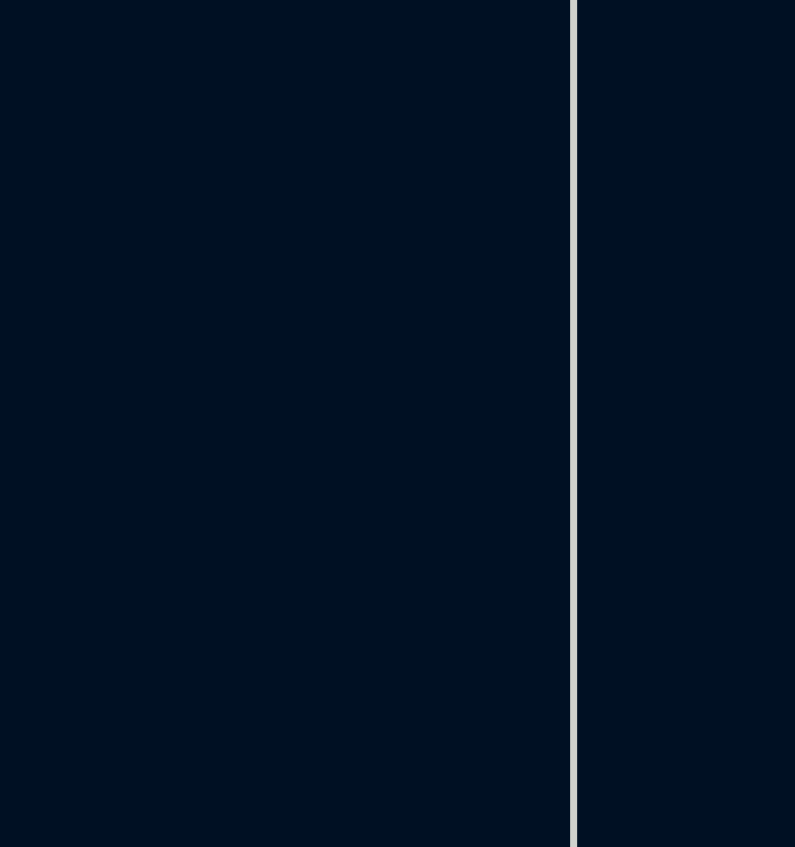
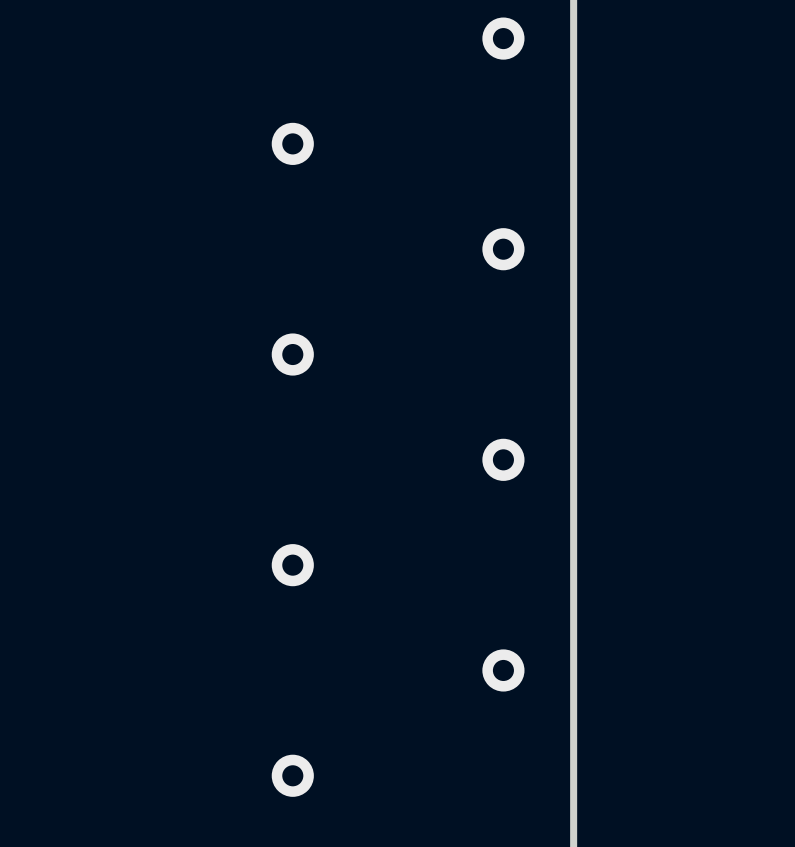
via: none -> (503, 38)
via: none -> (292, 143)
via: none -> (503, 249)
via: none -> (292, 354)
via: none -> (503, 459)
via: none -> (292, 565)
via: none -> (503, 670)
via: none -> (292, 775)

